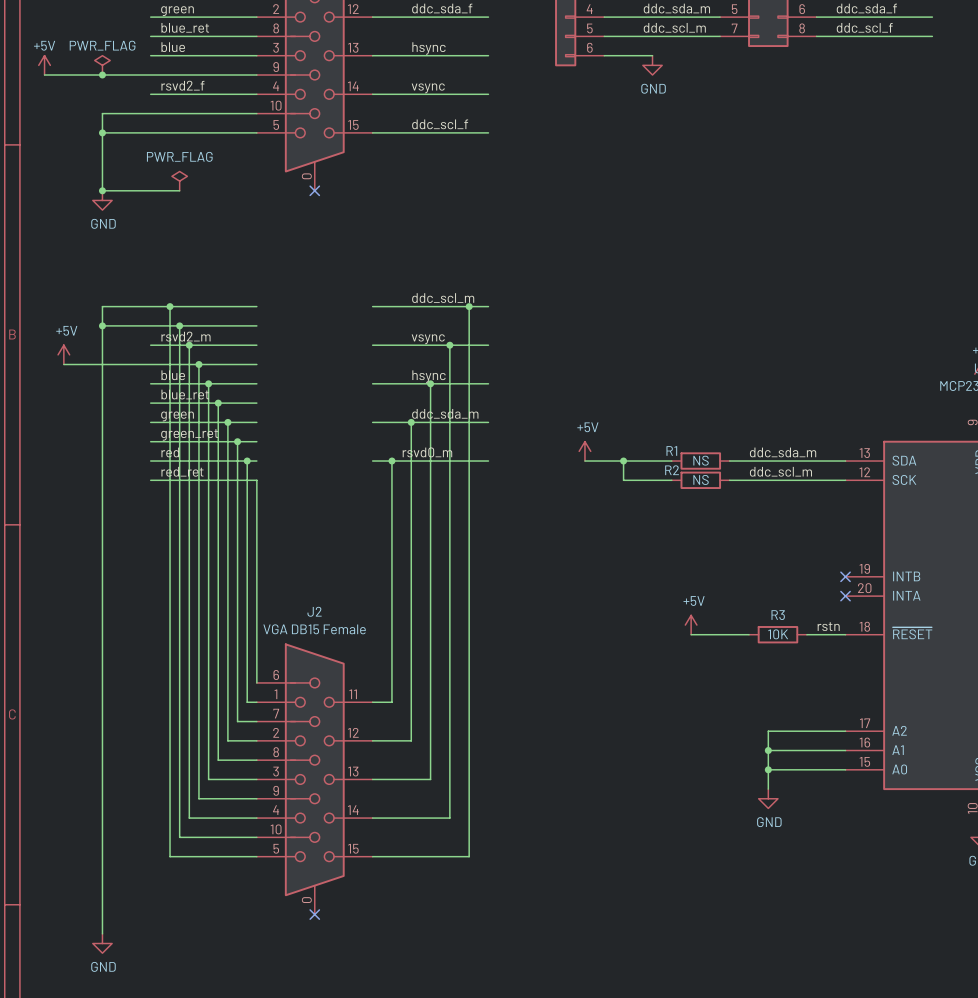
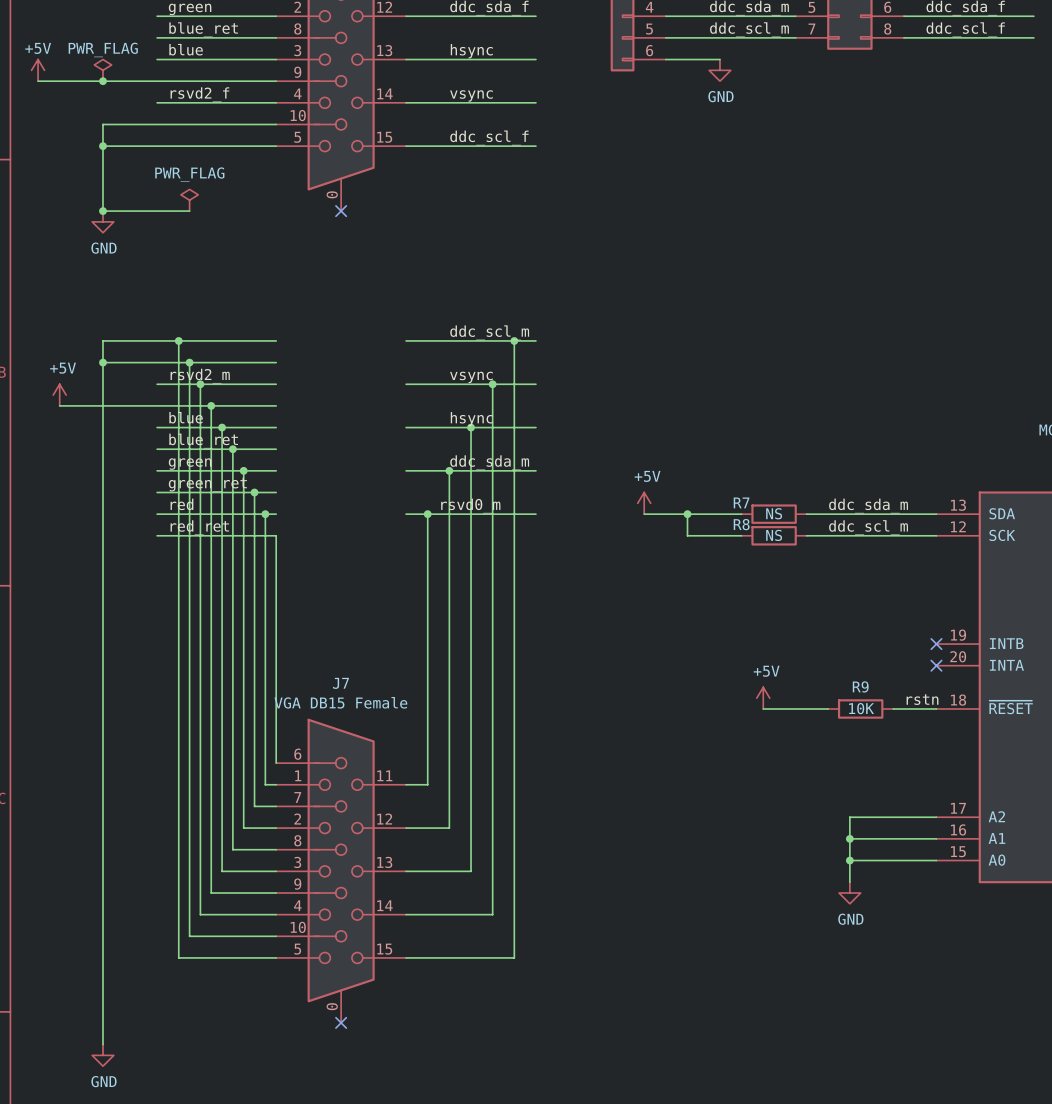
R1 name: R1 (671, 450) -> R7 (741, 502)
R2 name: R2 (672, 470) -> R8 (741, 524)
J2 name: J2 (314, 611) -> J7 (340, 683)
R3 name: R3 (778, 615) -> R9 (860, 686)

